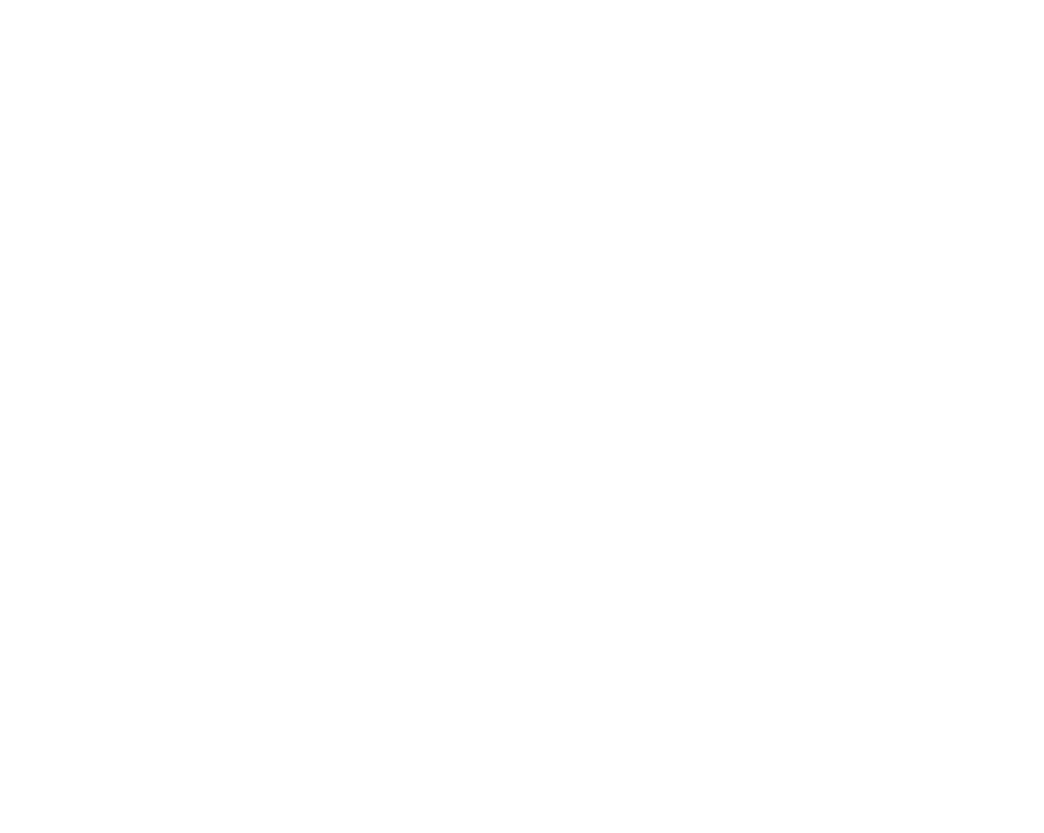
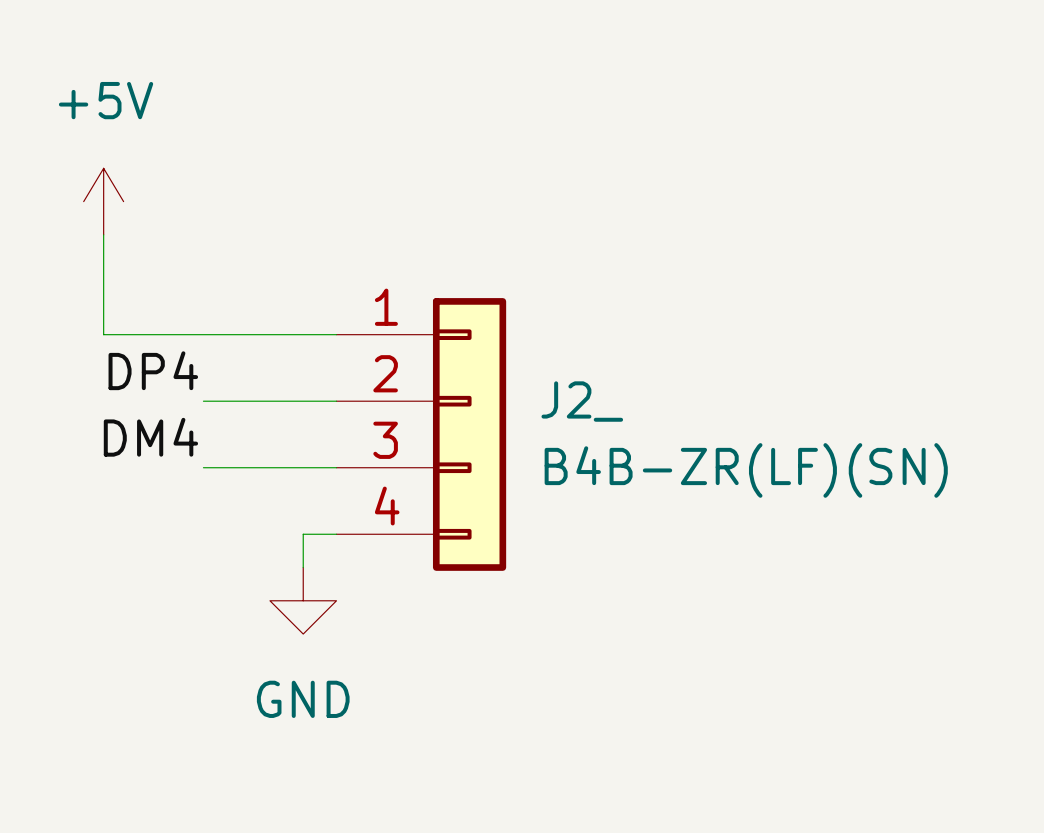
power symbol: none -> +5V (103, 201)
wire: none -> (103, 234) (103, 334) (336, 334)
label: none -> DP4 (153, 370)
wire: none -> (203, 401) (336, 401)
J2_: none -> B4B-ZR(LF)(SN) (421, 434)
label: none -> DM4 (150, 437)
wire: none -> (203, 467) (336, 467)
wire: none -> (336, 534) (303, 534) (303, 567)
power symbol: none -> GND (303, 600)

